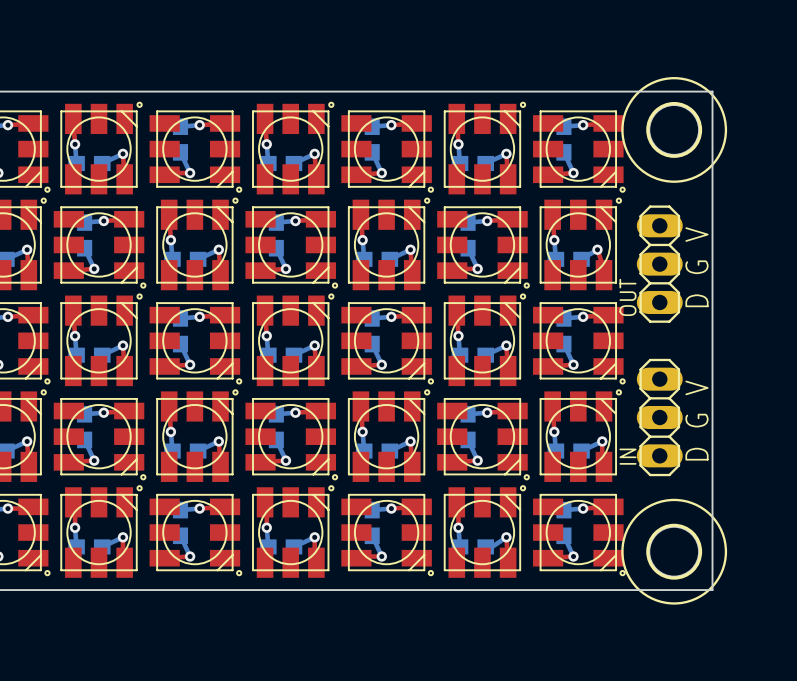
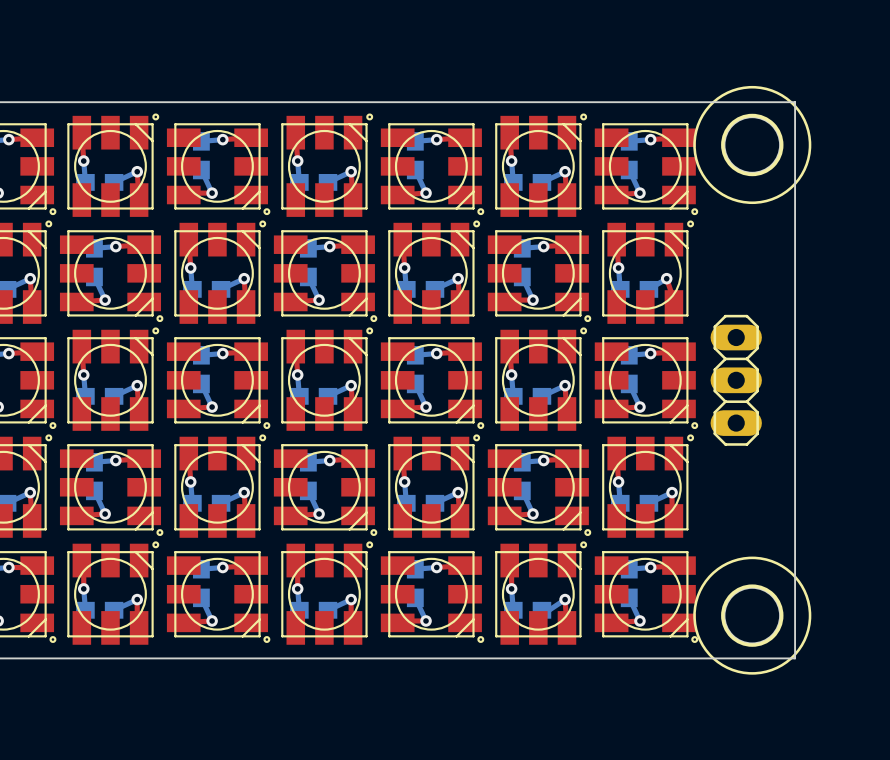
OUT: (659, 264) -> none
text: D G V (696, 267) -> none
part: none -> (736, 380)
IN: (659, 417) -> none
text: D G V (696, 420) -> none

